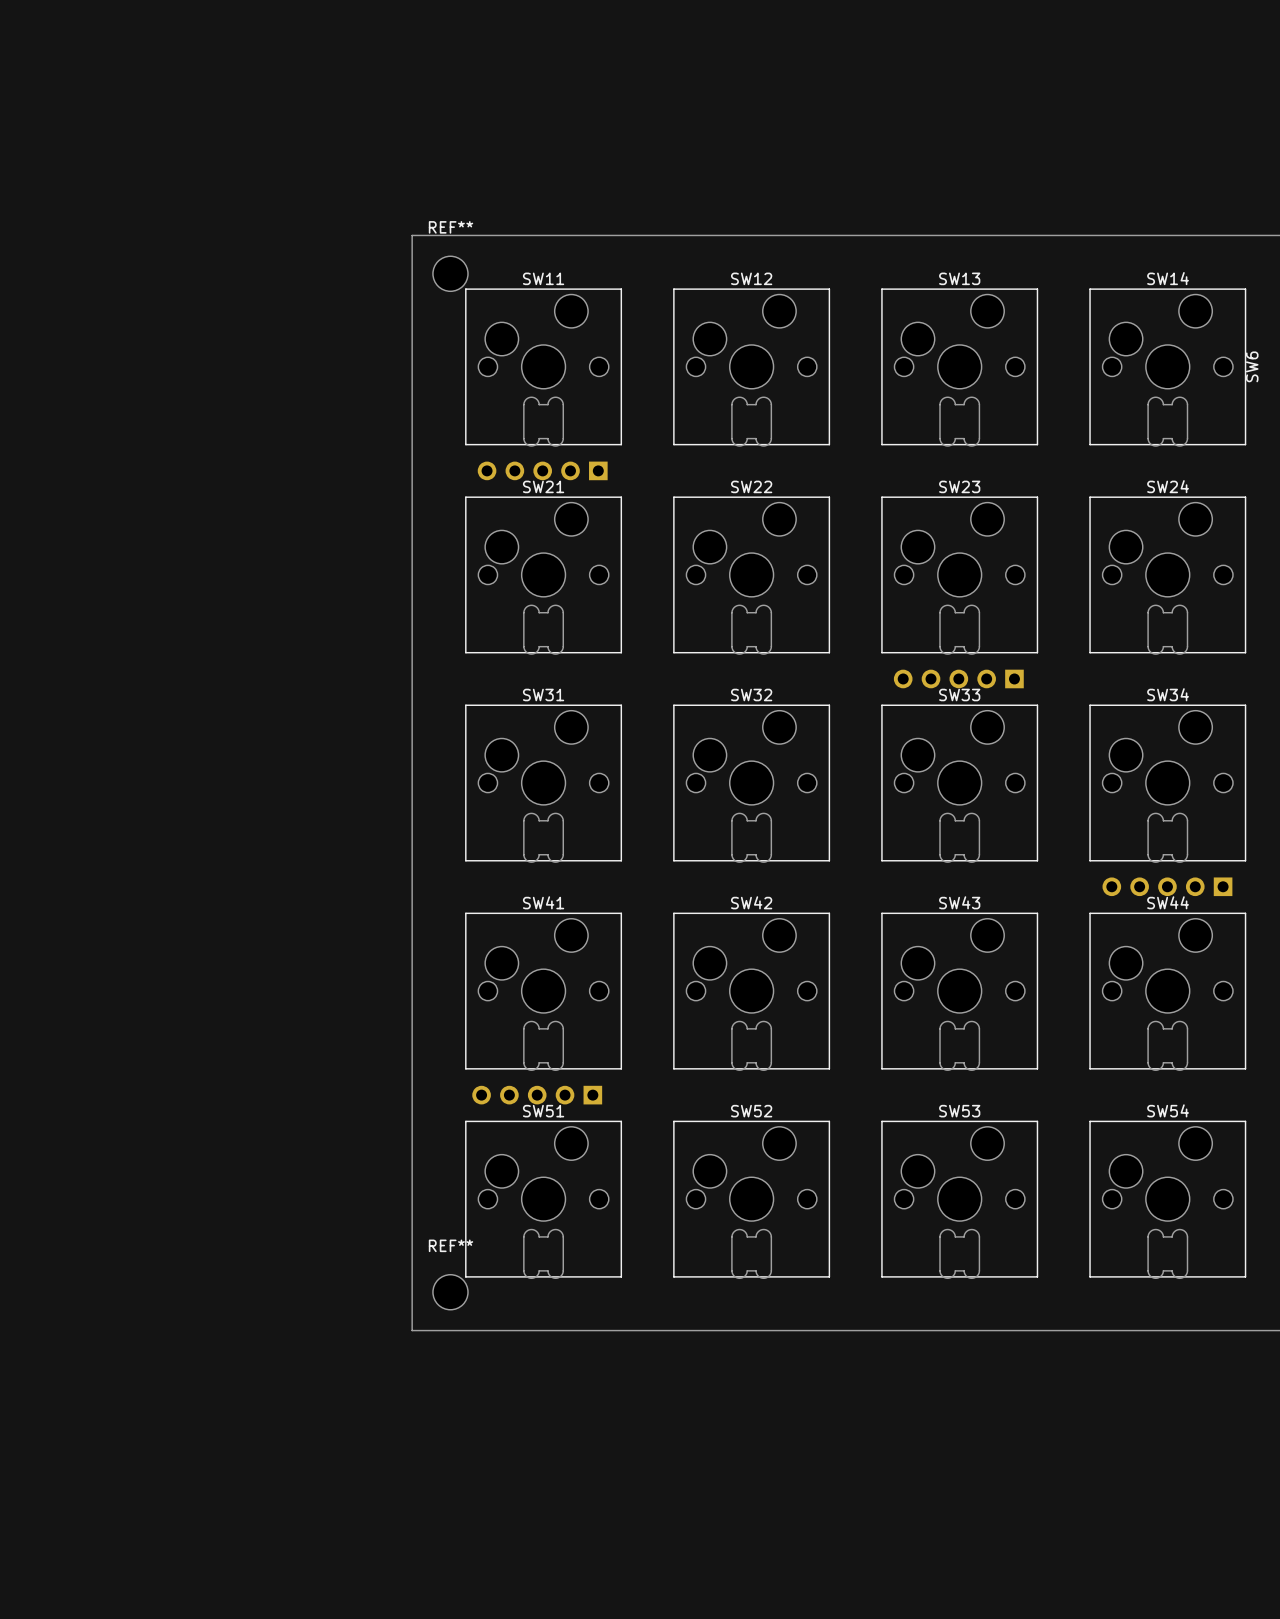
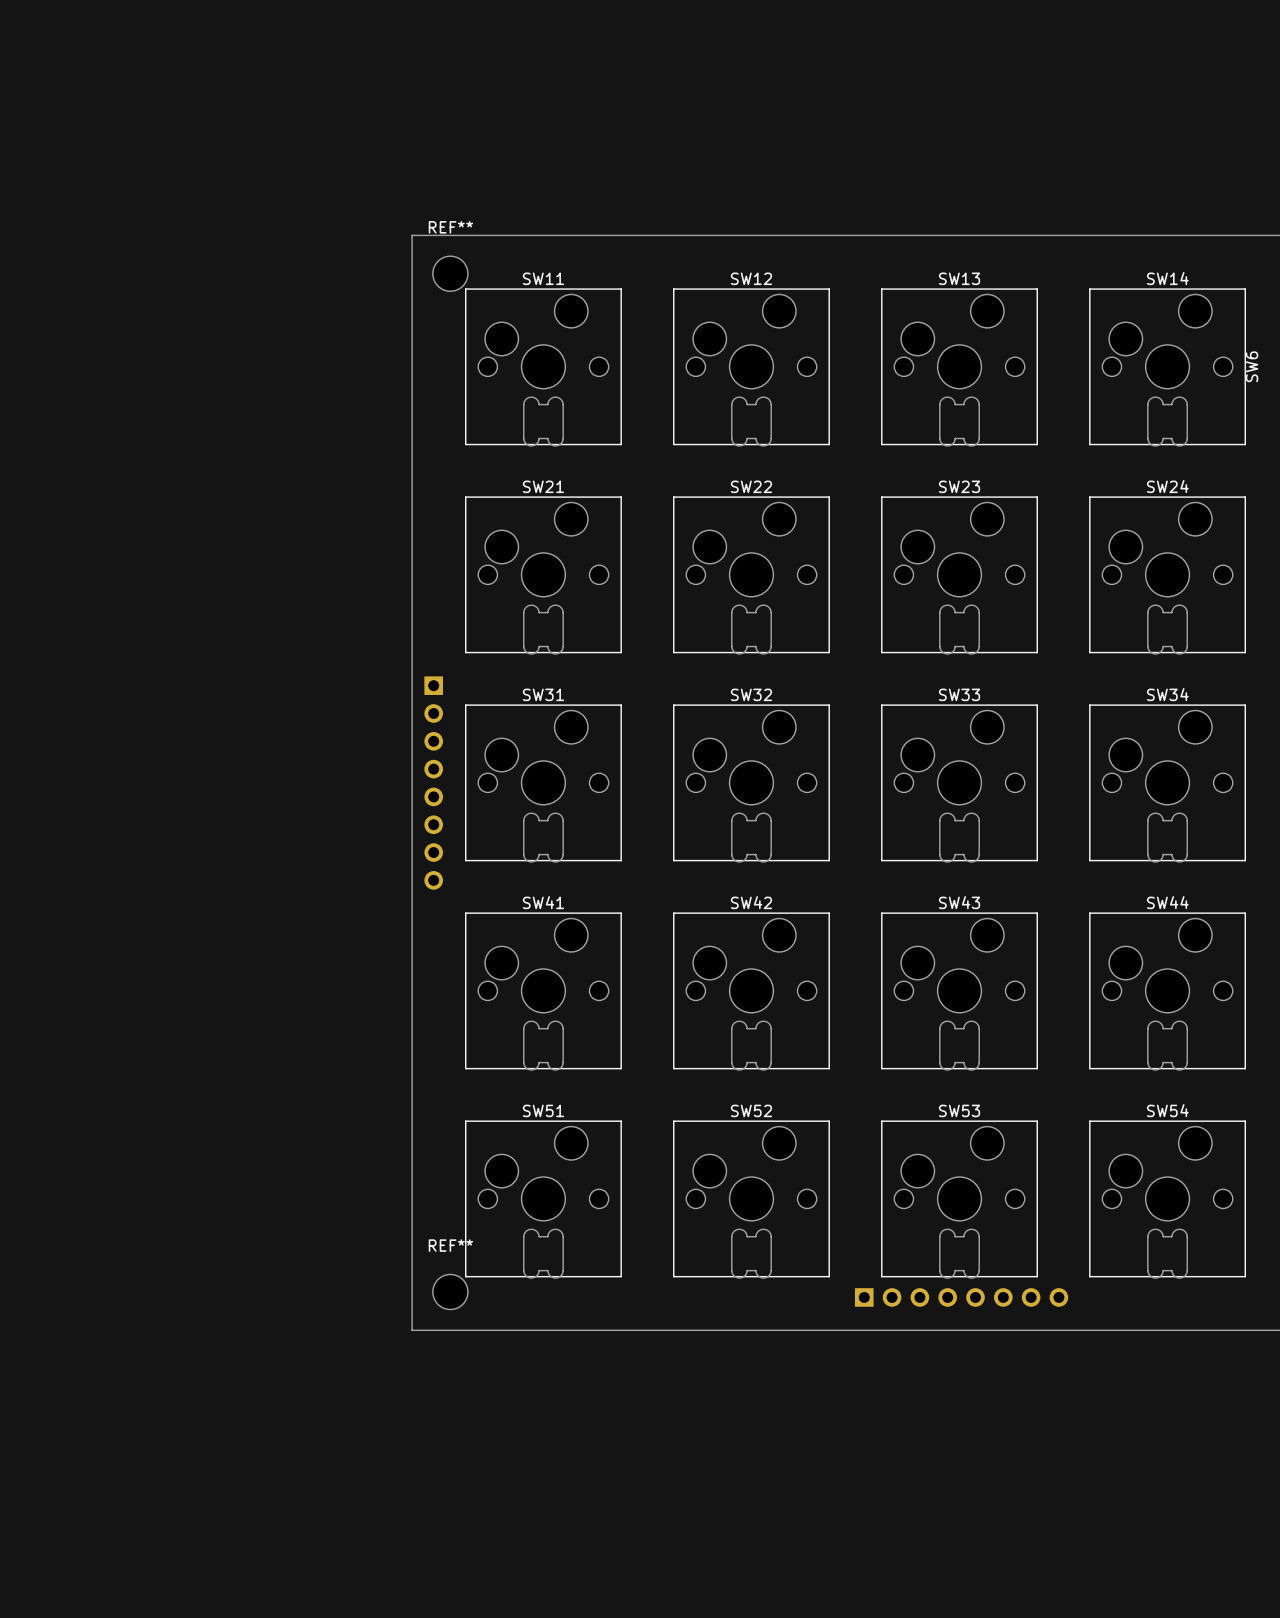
part: (542, 470) -> none
part: (958, 678) -> none
part: none -> (433, 783)
part: (1167, 886) -> none
part: (537, 1095) -> none
part: none -> (961, 1297)

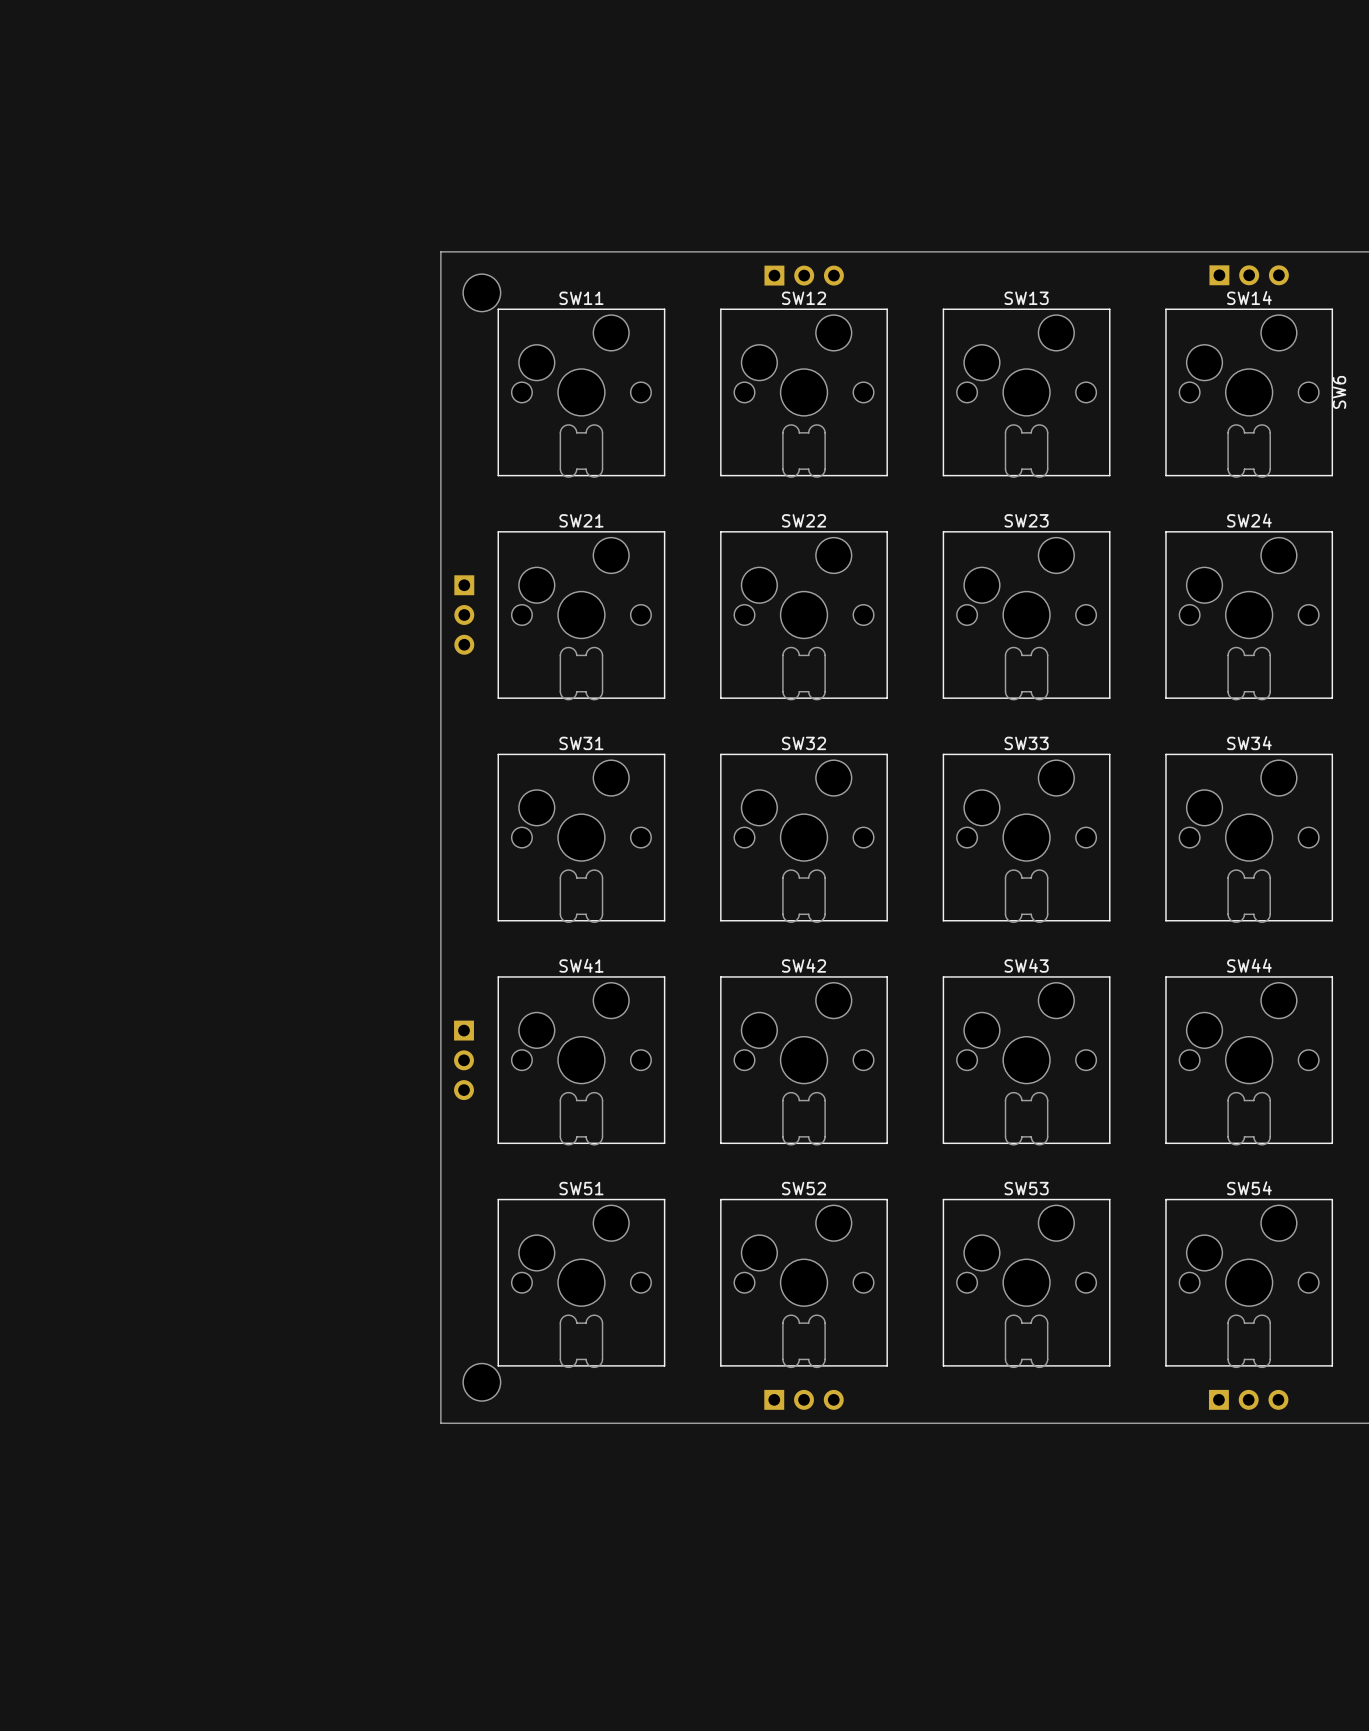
REF** name: REF** (450, 227) -> none
part: none -> (804, 275)
part: none -> (1249, 275)
part: none -> (464, 615)
part: (433, 783) -> none
part: none -> (464, 1060)
REF** name: REF** (450, 1245) -> none
part: (961, 1297) -> none
part: none -> (804, 1399)
part: none -> (1248, 1399)

